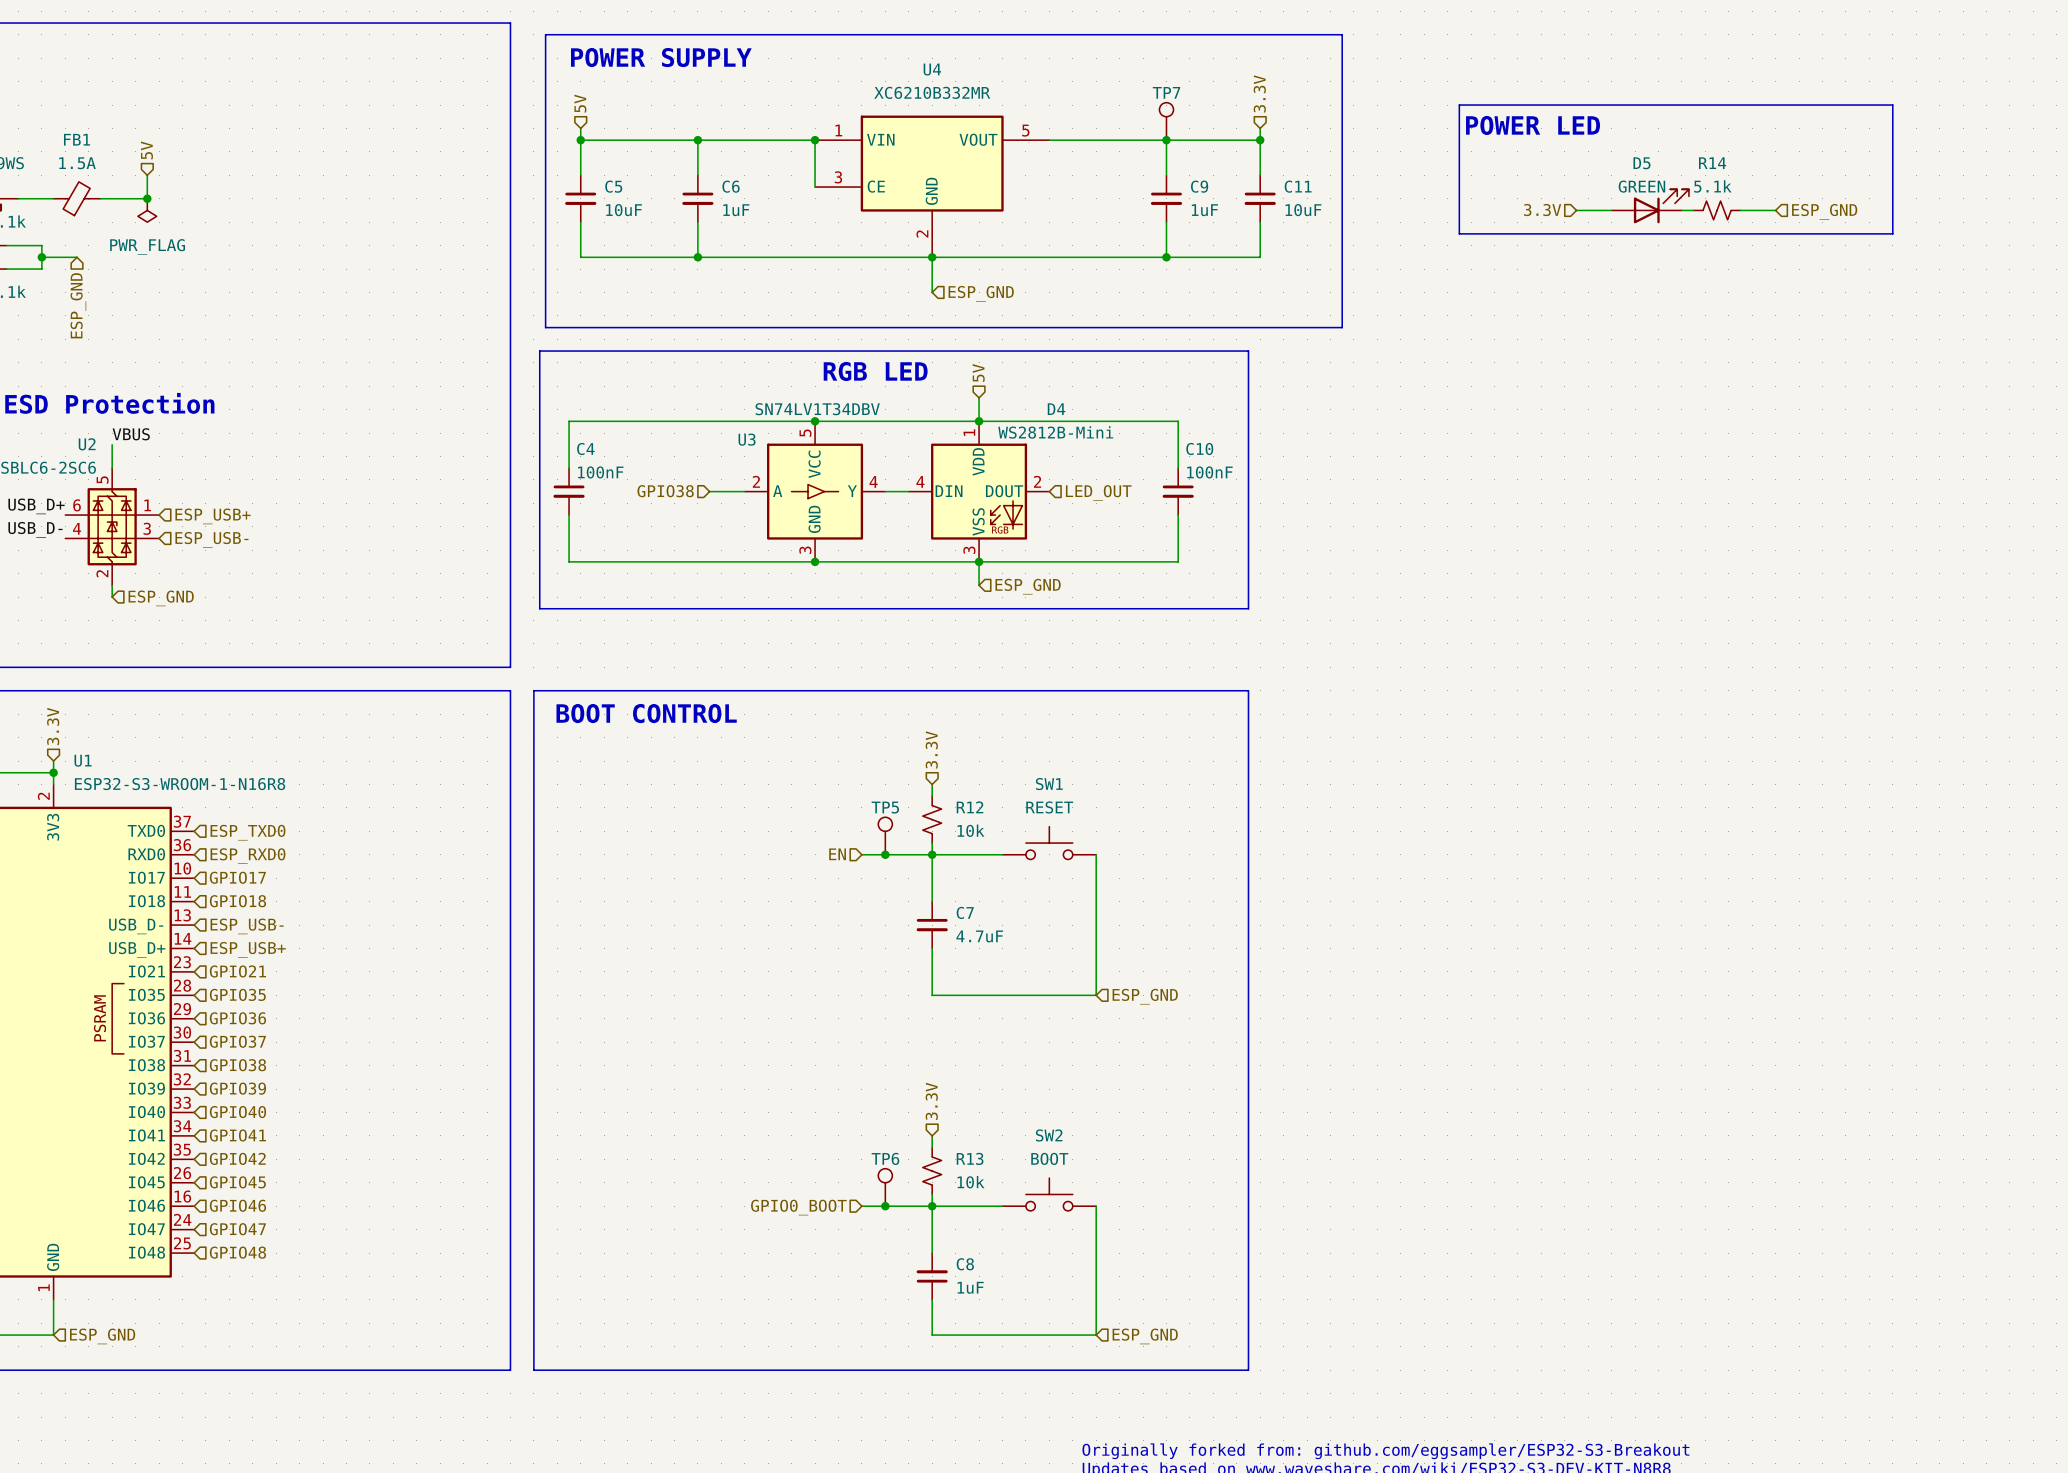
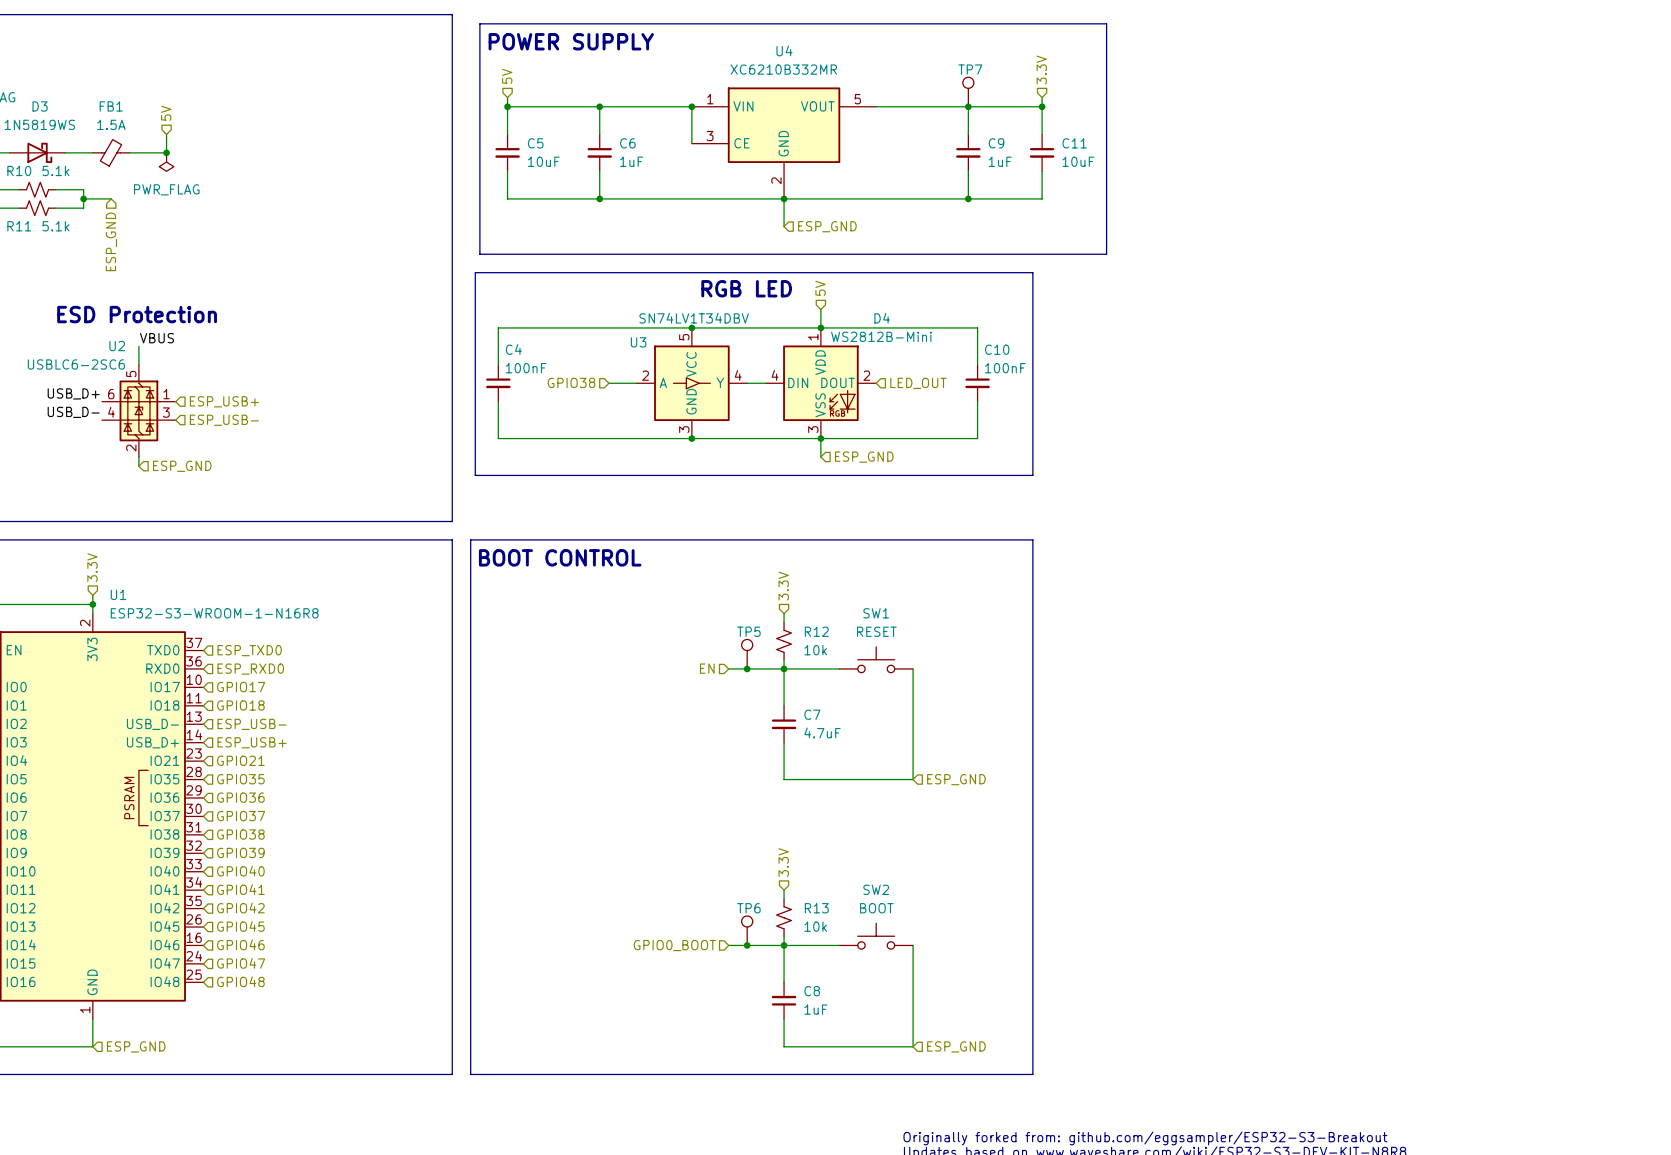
line: (1459, 105) (1892, 105) (1892, 233) (1459, 233) (1459, 105) -> none
text: POWER LED (1533, 125) -> none
D5: GREEN (1650, 206) -> none
hierarchical label: 3.3V (1542, 210) -> none
wire: (1576, 210) (1611, 210) -> none
wire: (1681, 210) (1693, 210) -> none
R14: 5.1k (1717, 210) -> none
wire: (1740, 210) (1775, 210) -> none
hierarchical label: ESP_GND (1824, 211) -> none

